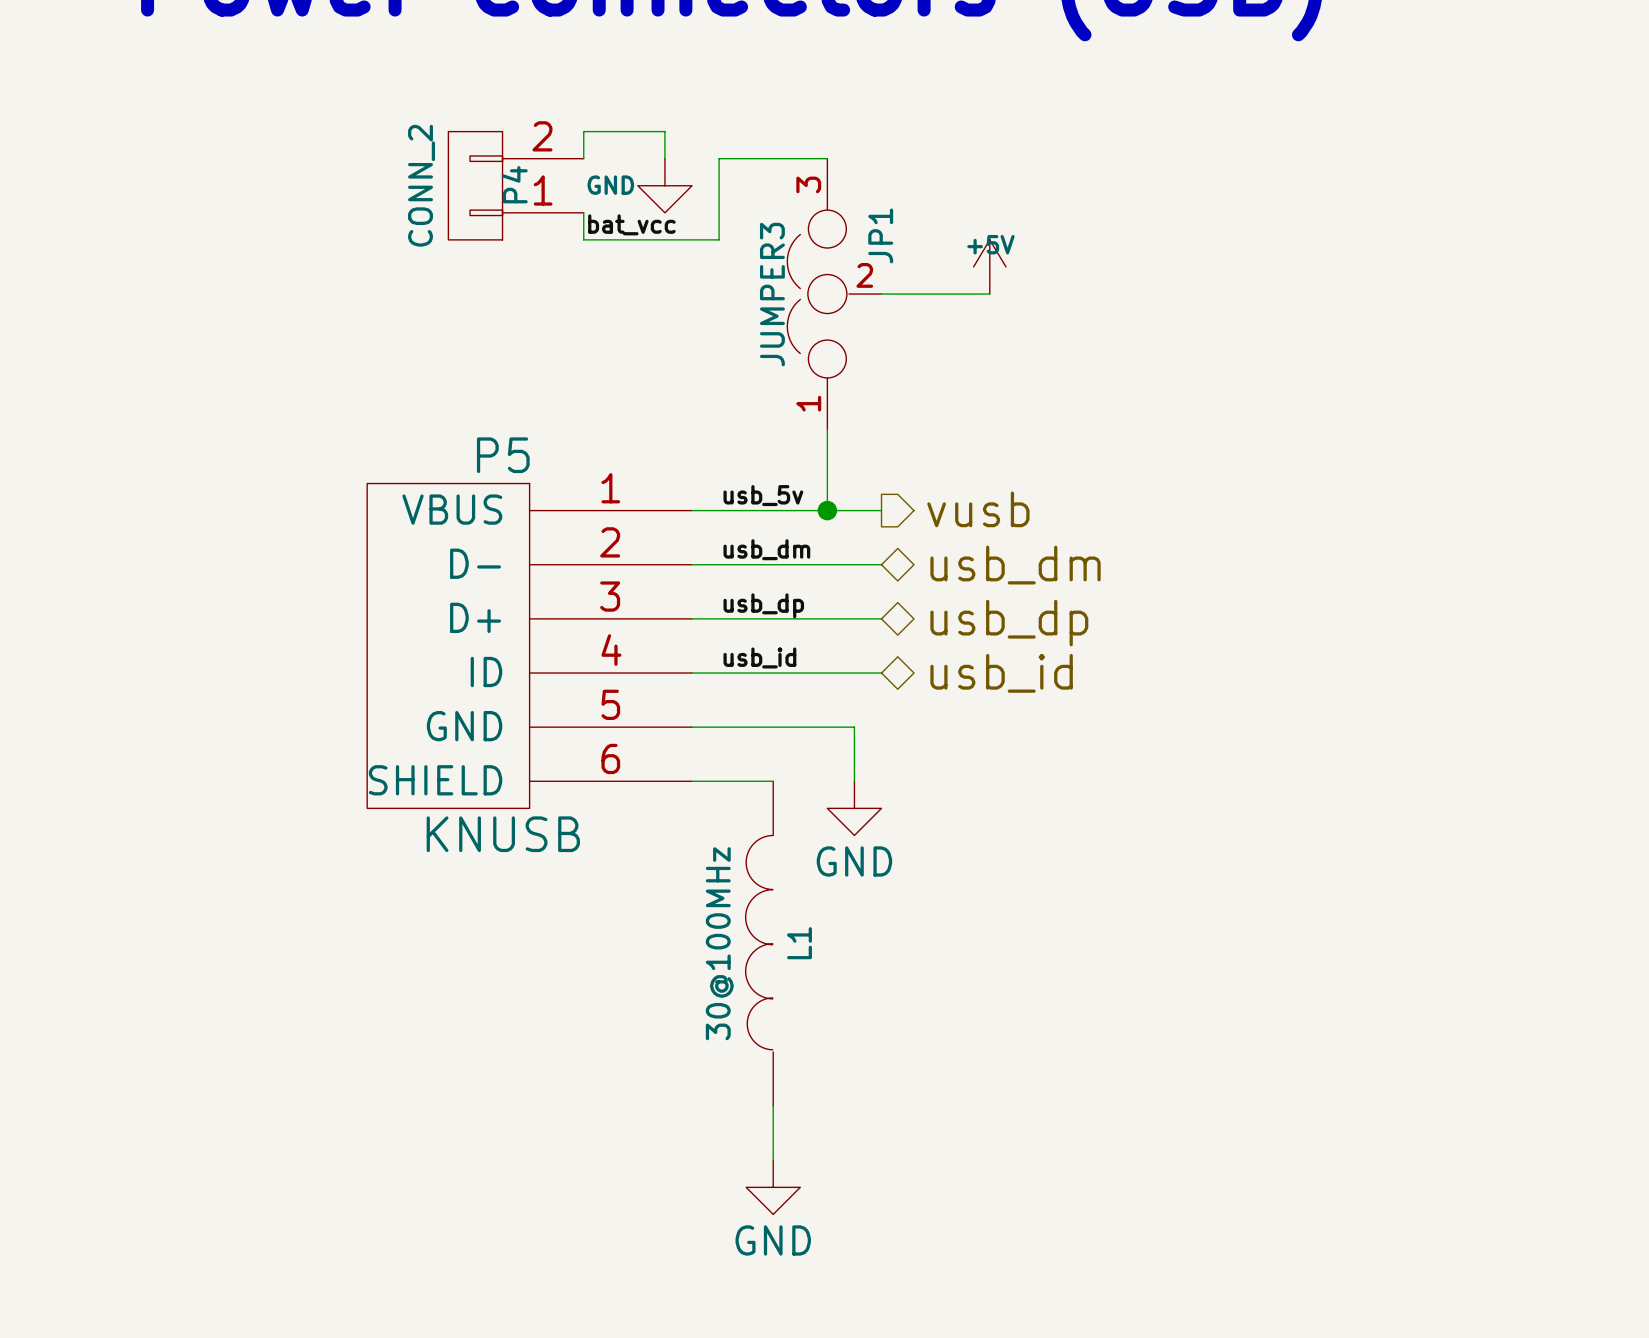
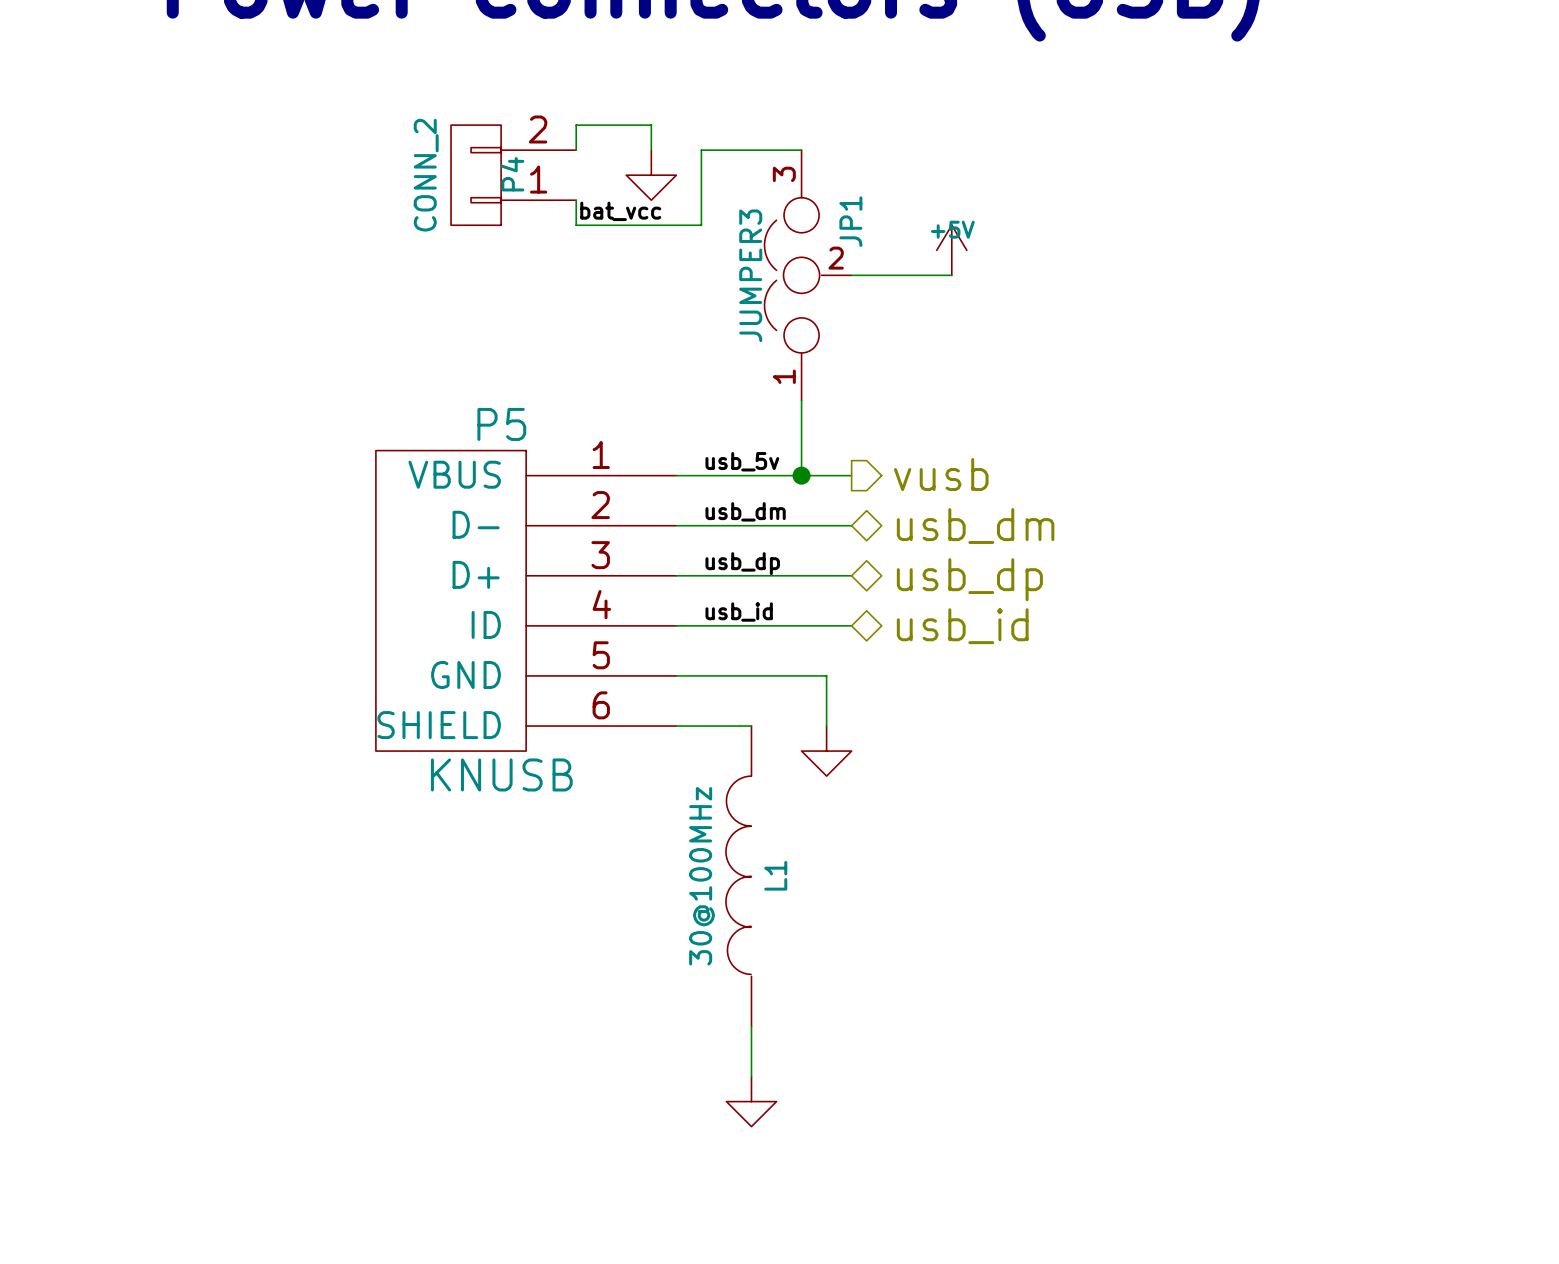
power symbol text: GND (610, 185) -> none
power symbol text: GND (854, 861) -> none
power symbol text: GND (773, 1240) -> none

